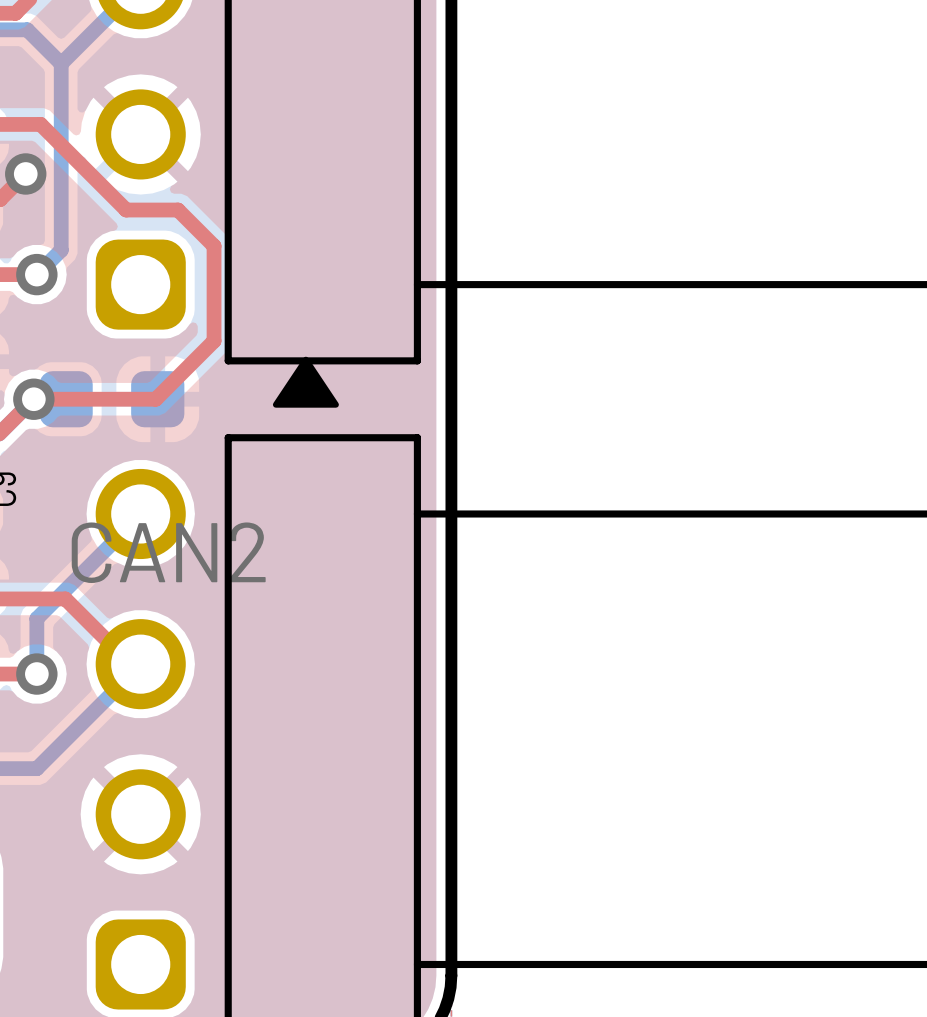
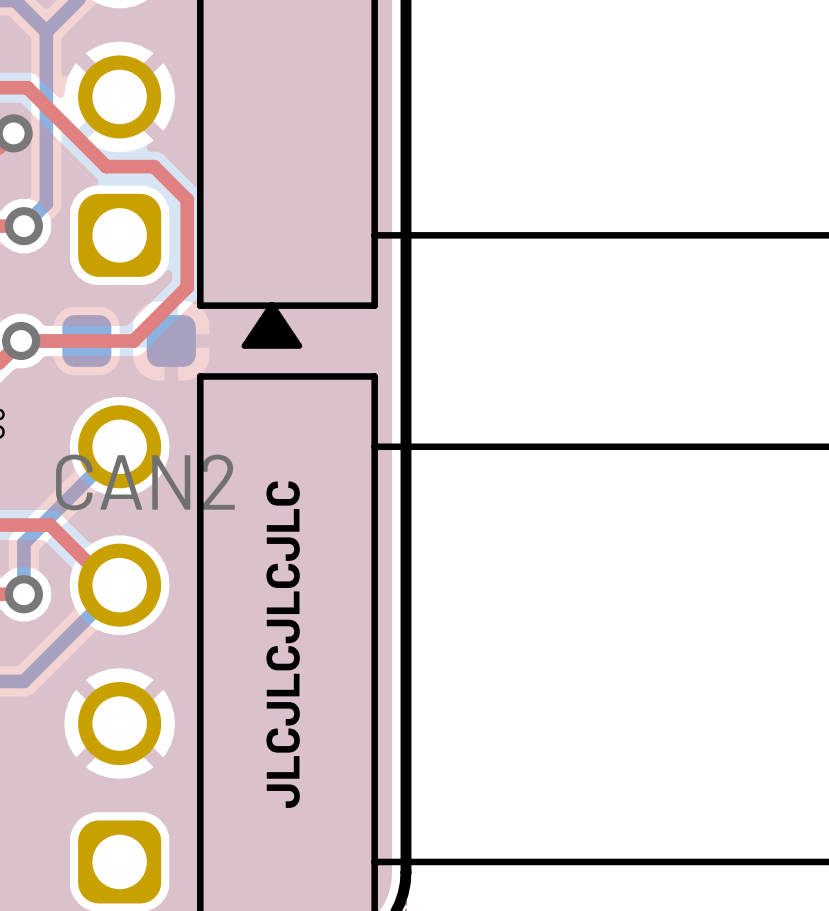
part position: (111, 399) -> (129, 341)
text: none -> JLCJLCJLCJLC (283, 644)

